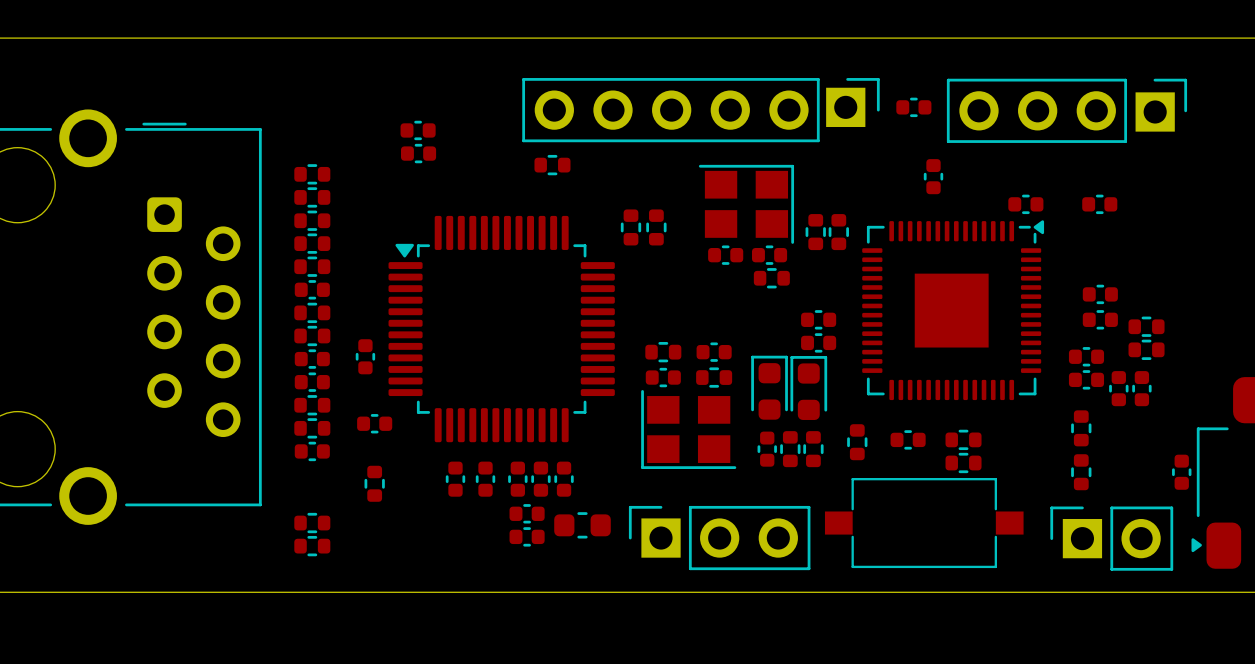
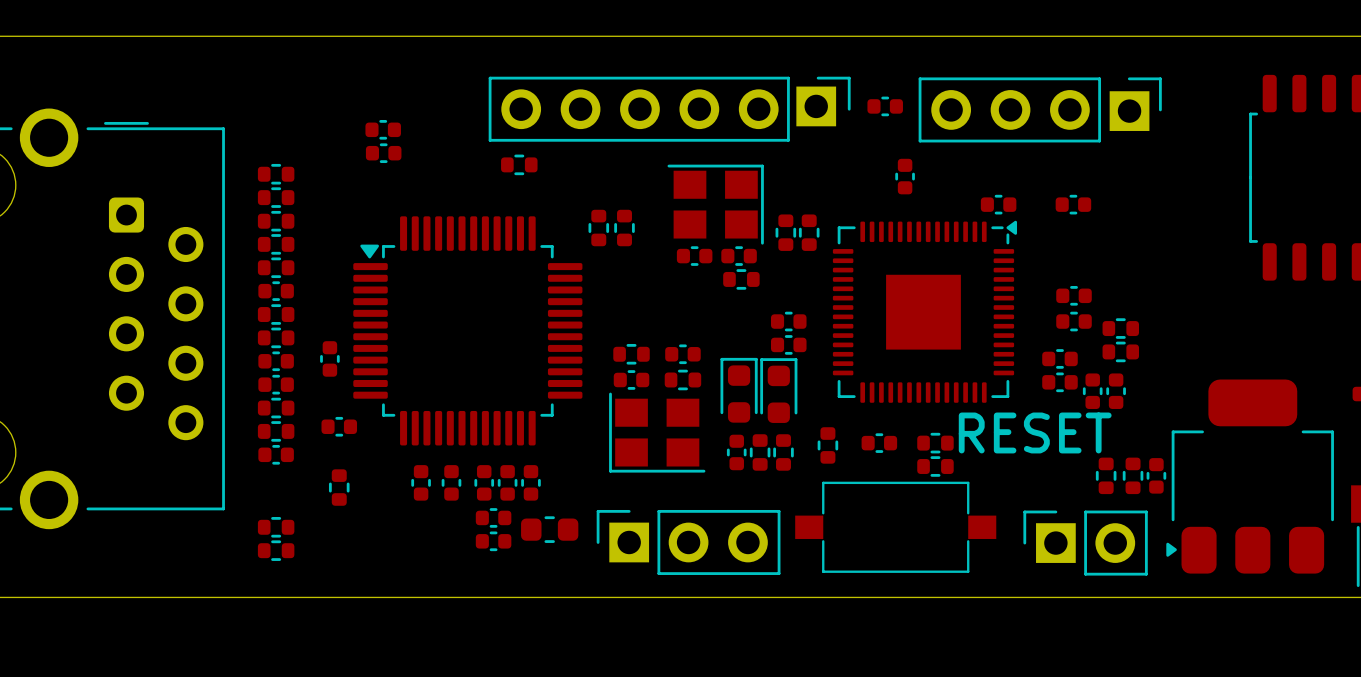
part: (1081, 428) -> none
text: none -> RESET (1035, 432)
part: (1081, 472) -> none
part: none -> (1106, 475)
part: none -> (1133, 475)

